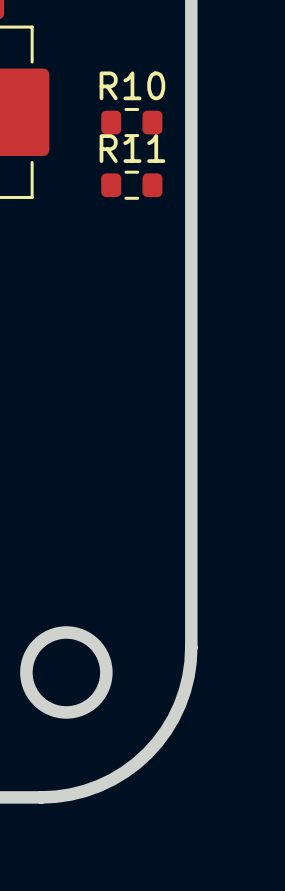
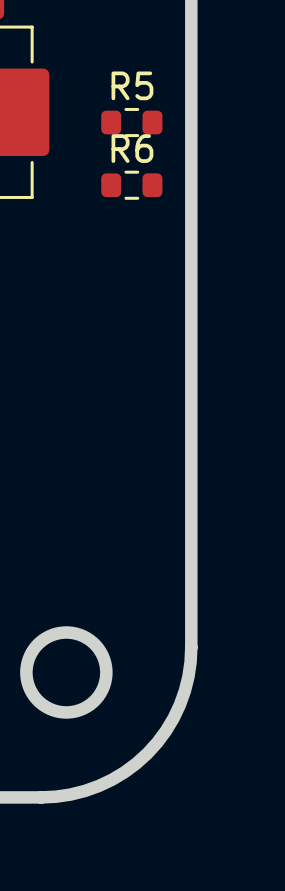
R10 name: R10 (132, 85) -> R5 (132, 85)
R11 name: R11 (132, 148) -> R6 (132, 148)

